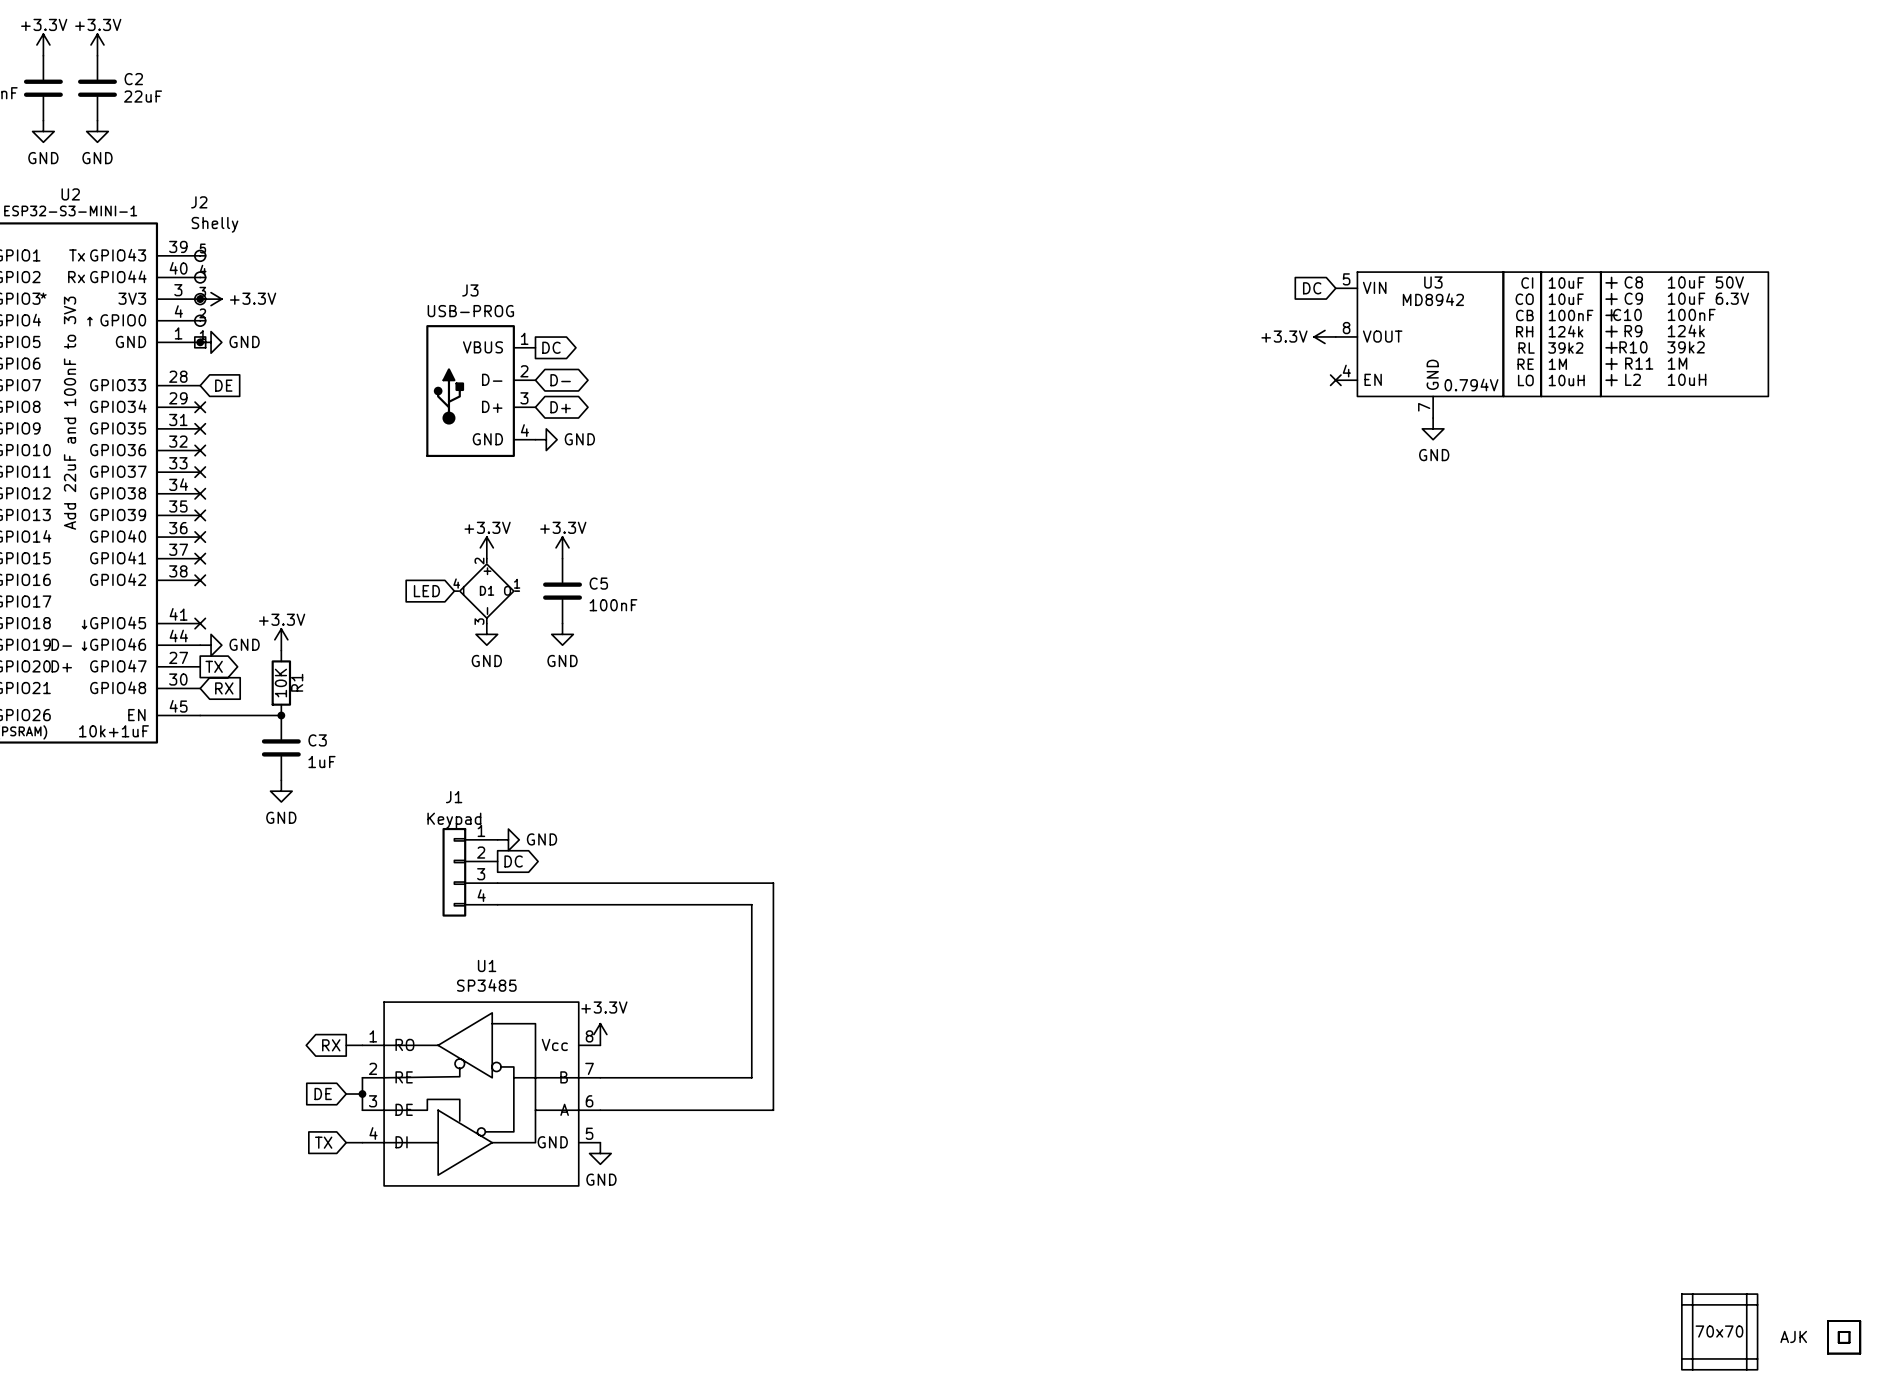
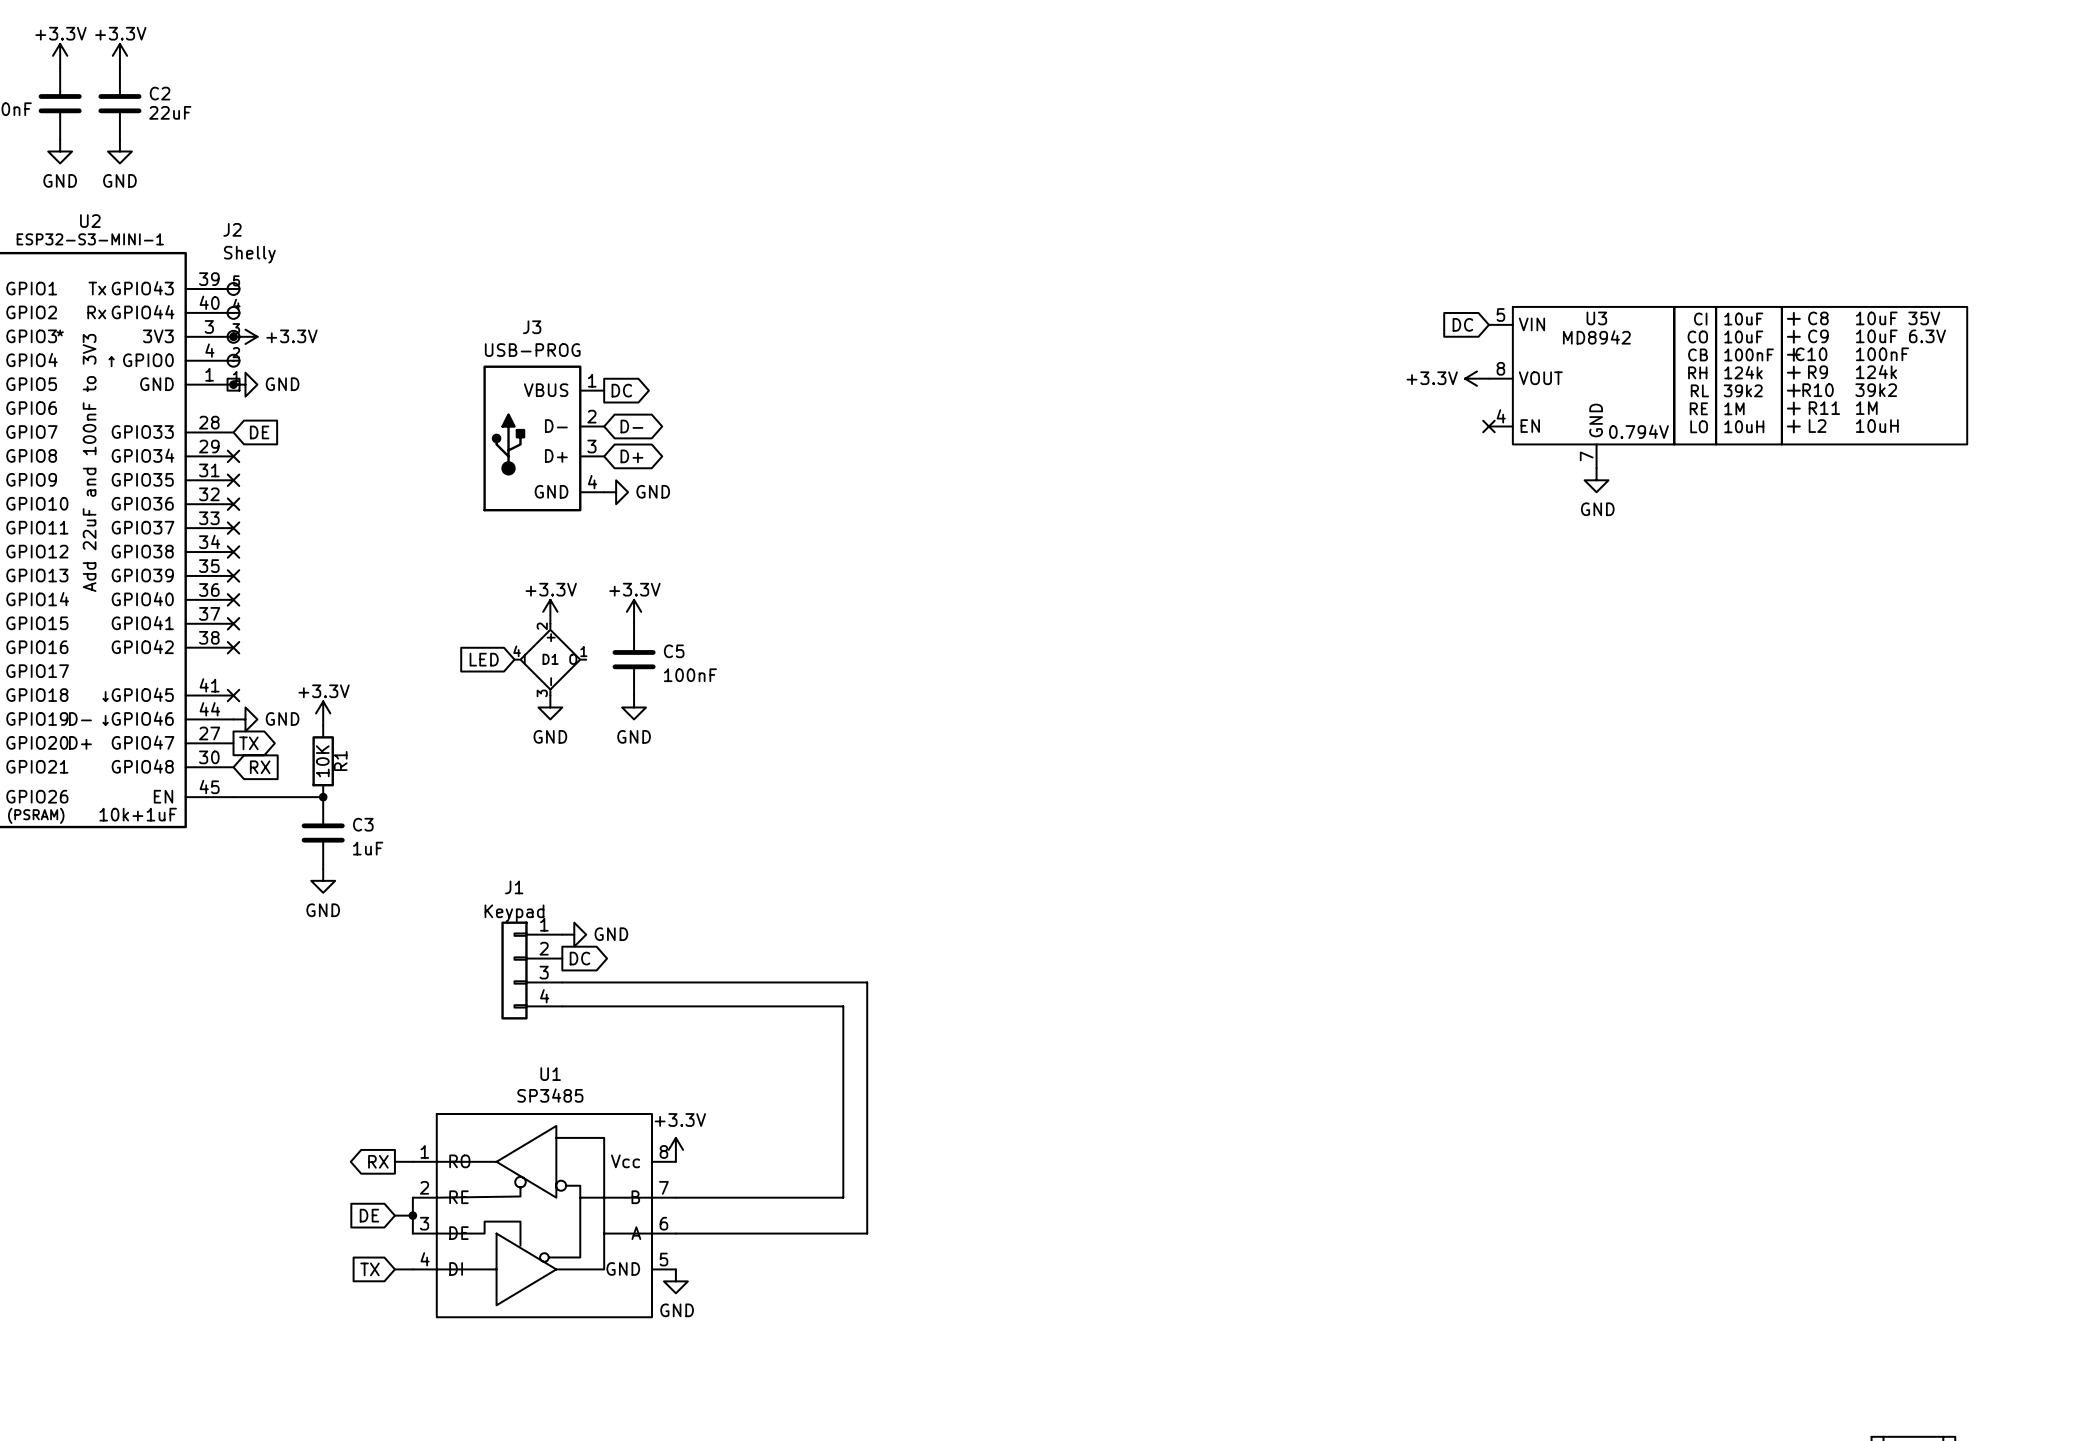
C8 value: 10uF 50V (1705, 282) -> 10uF 35V (1898, 318)

